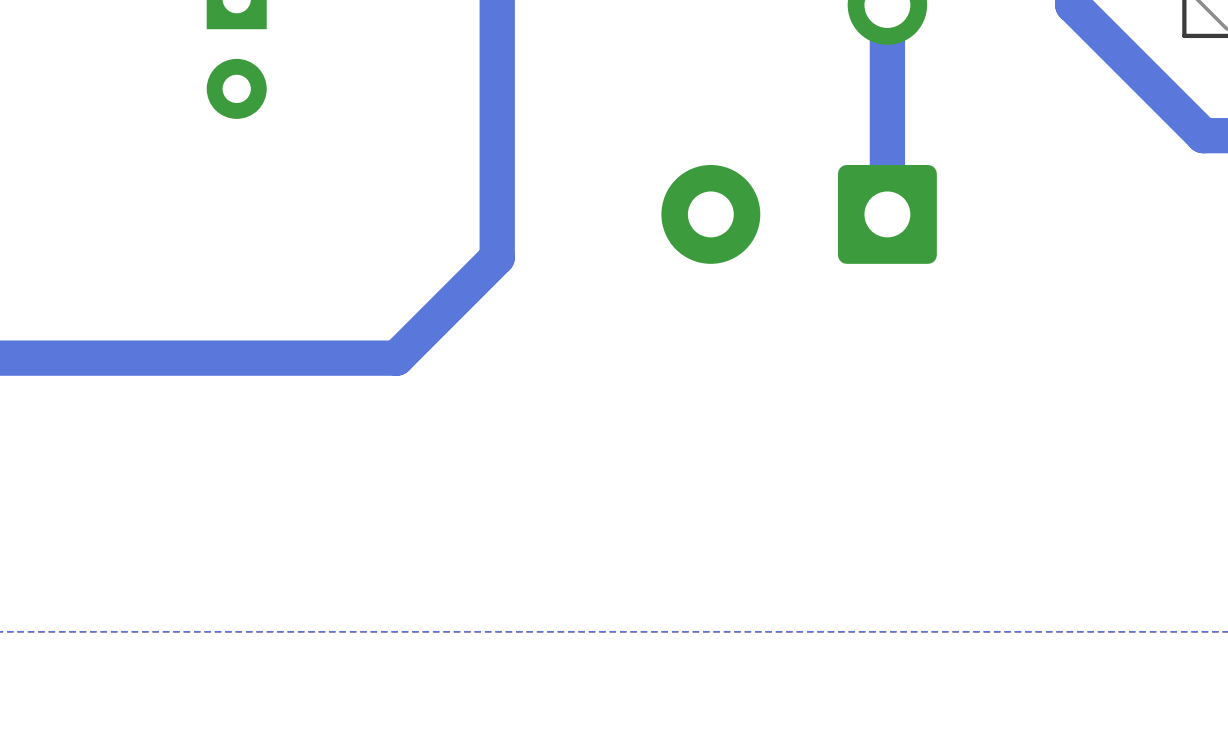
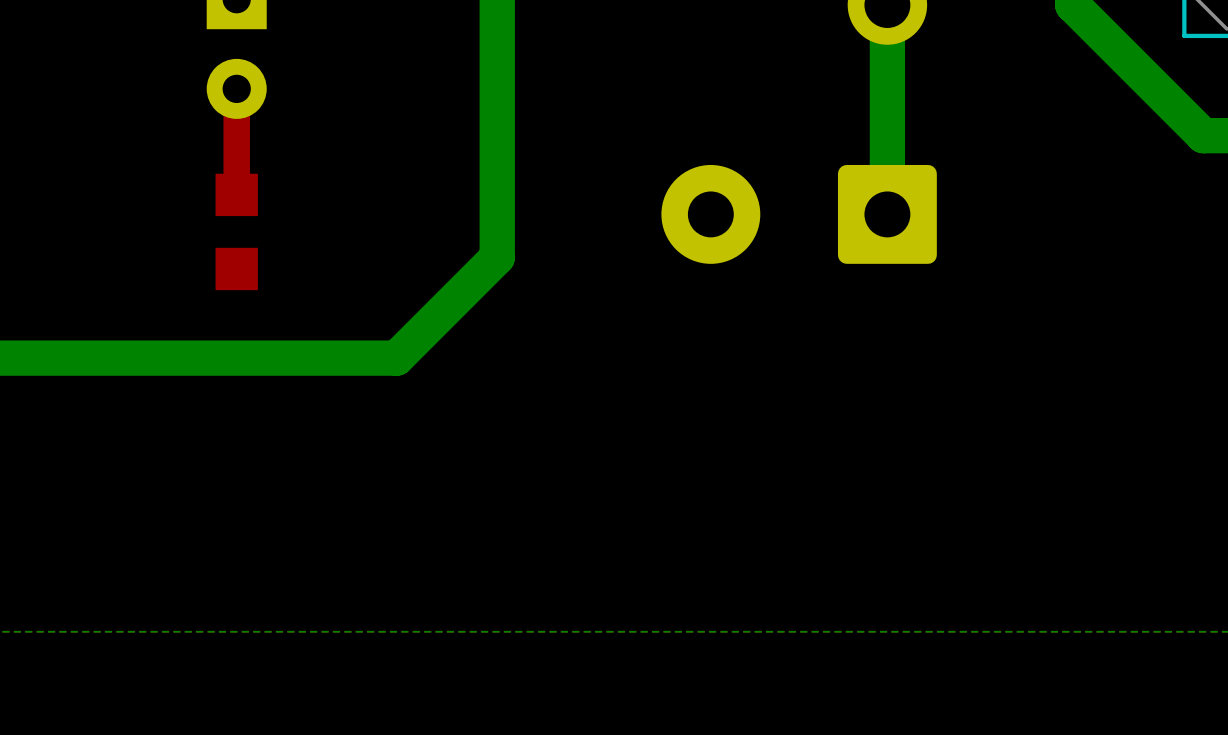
top track: none -> (236, 88) (236, 194)
part: none -> (236, 231)

